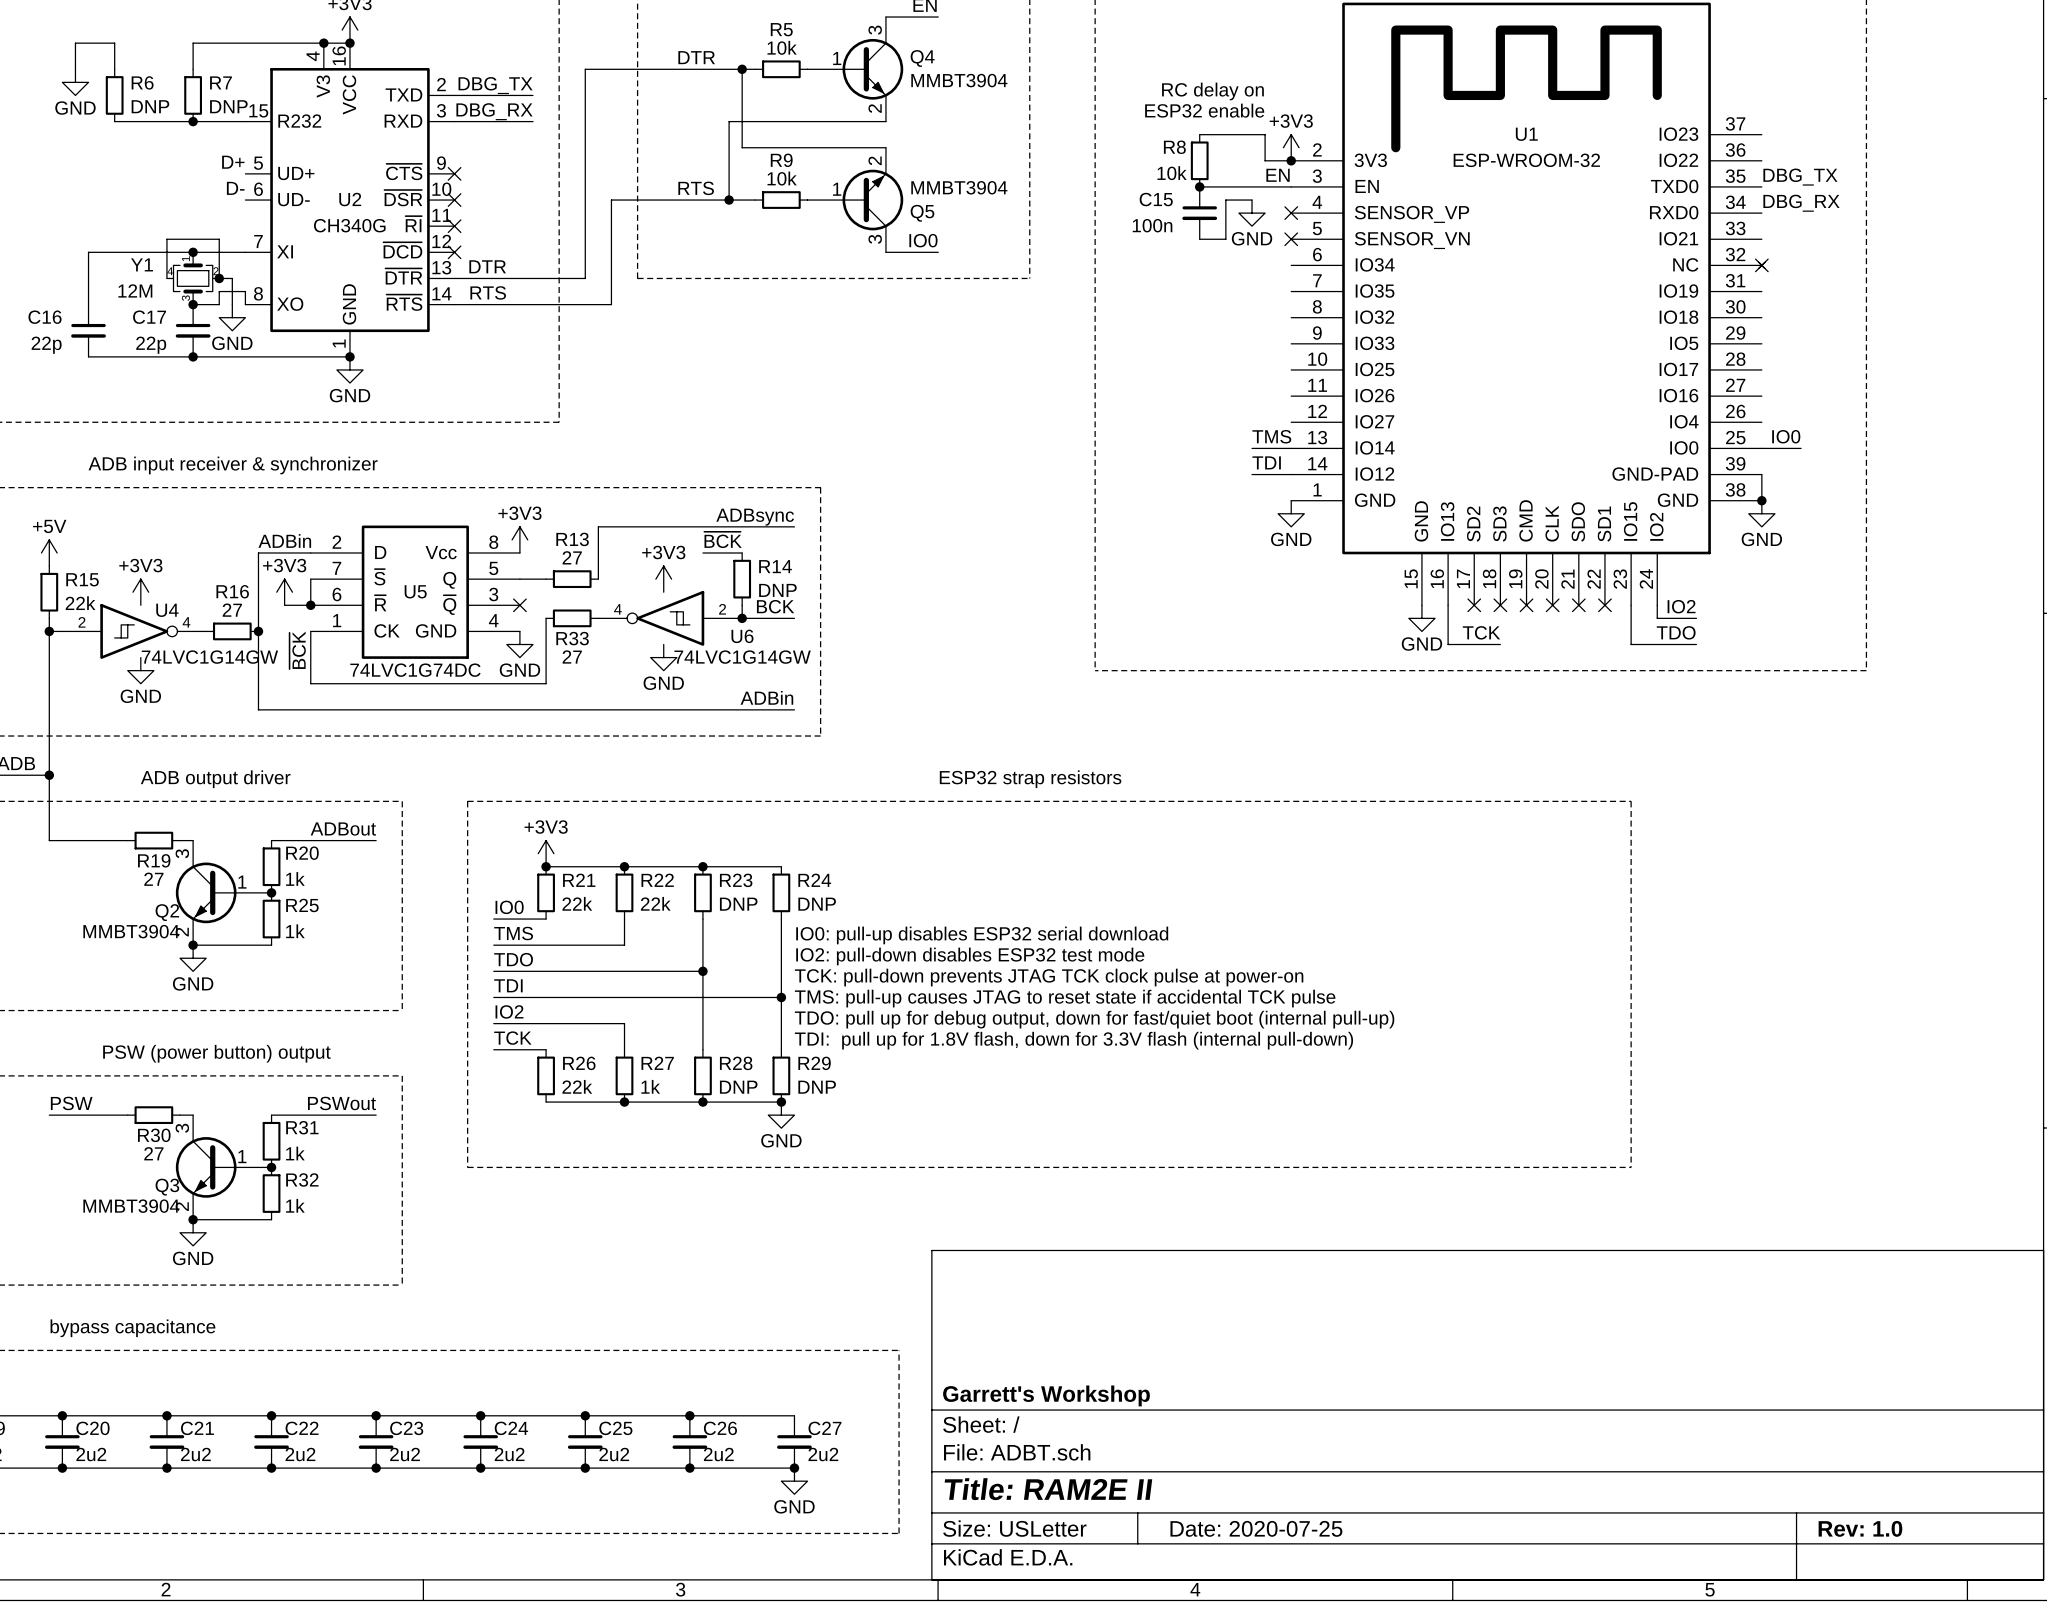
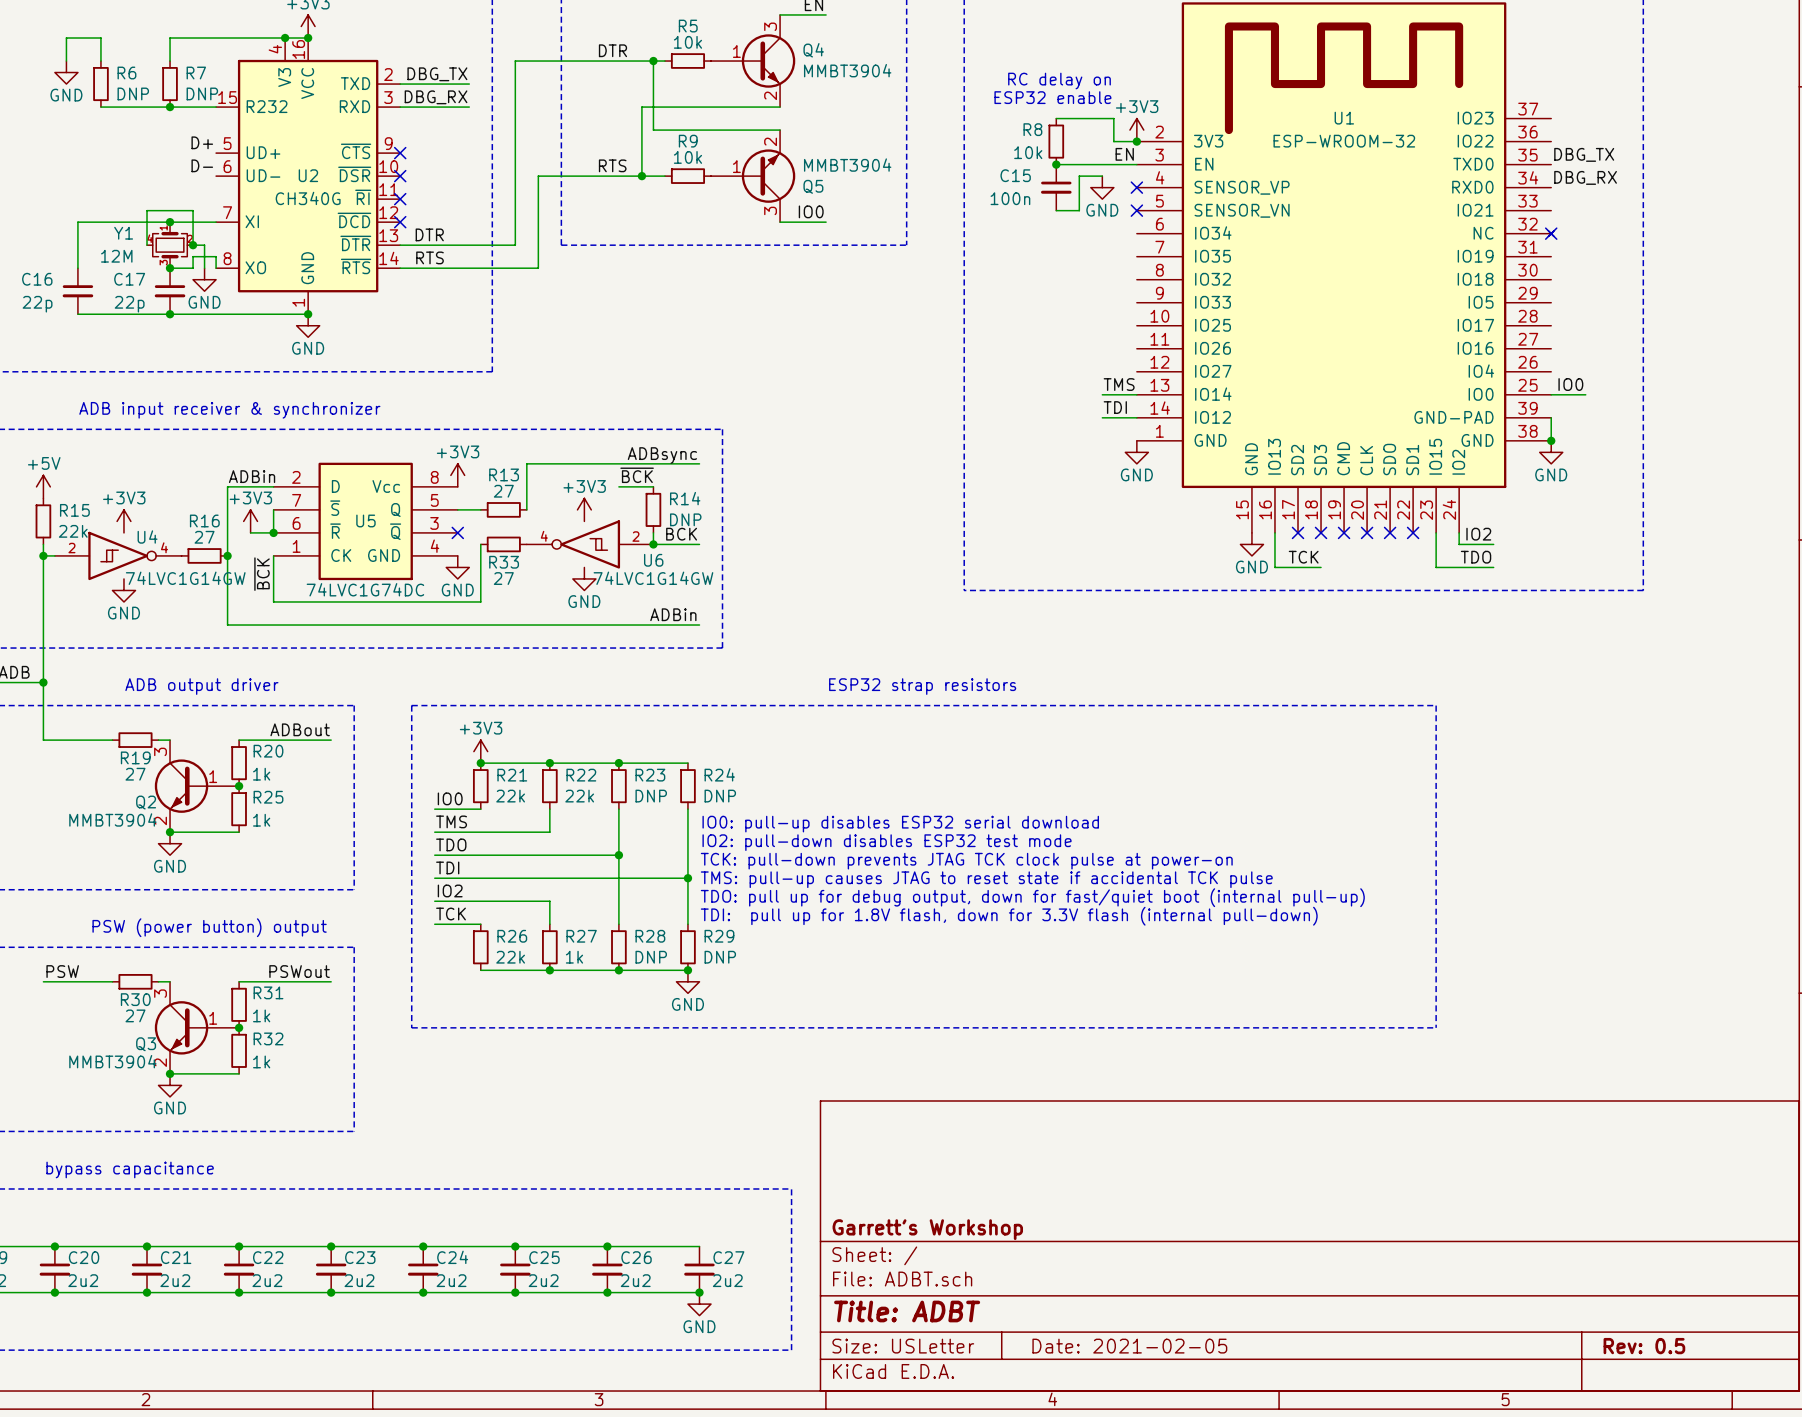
title block: Title: RAM2E II (1048, 1489) -> Title: ADBT (907, 1311)
title block: Date: 2020-07-25 (1256, 1528) -> Date: 2021-02-05 (1129, 1346)
title block: Rev: 1.0 (1860, 1528) -> Rev: 0.5 (1644, 1346)

